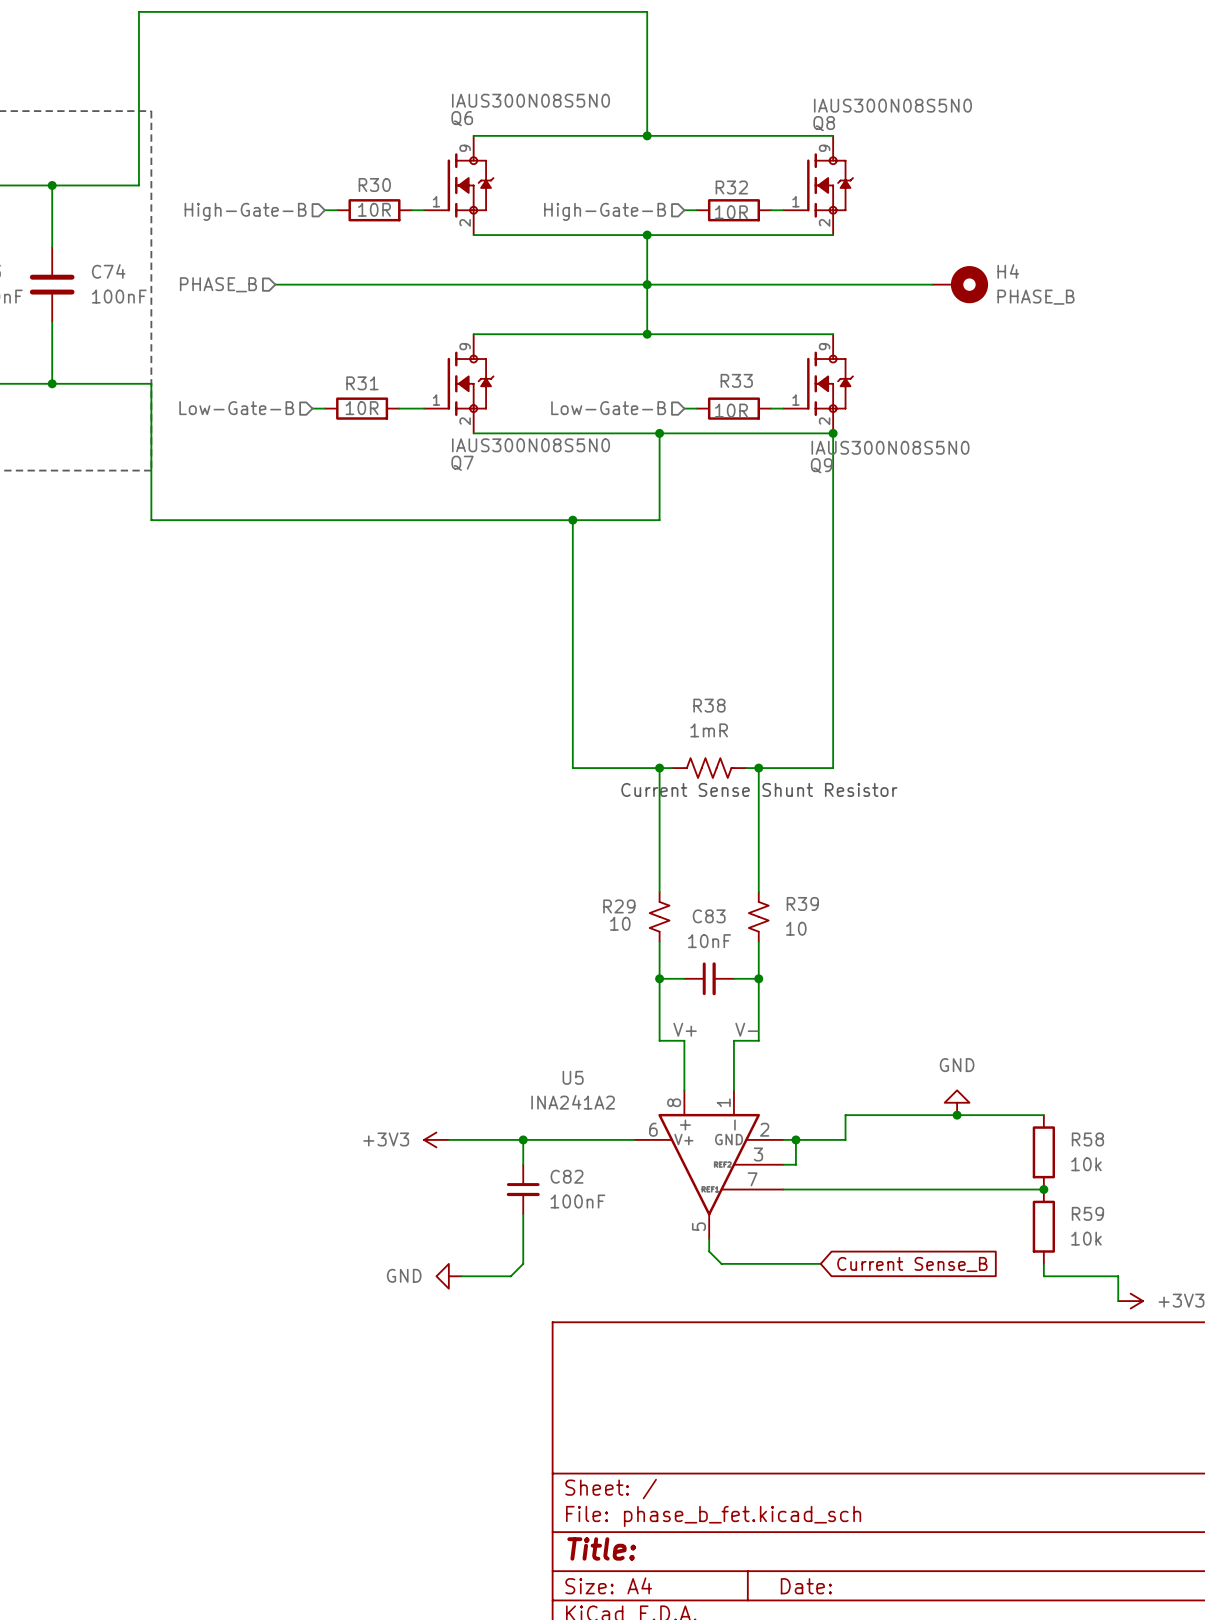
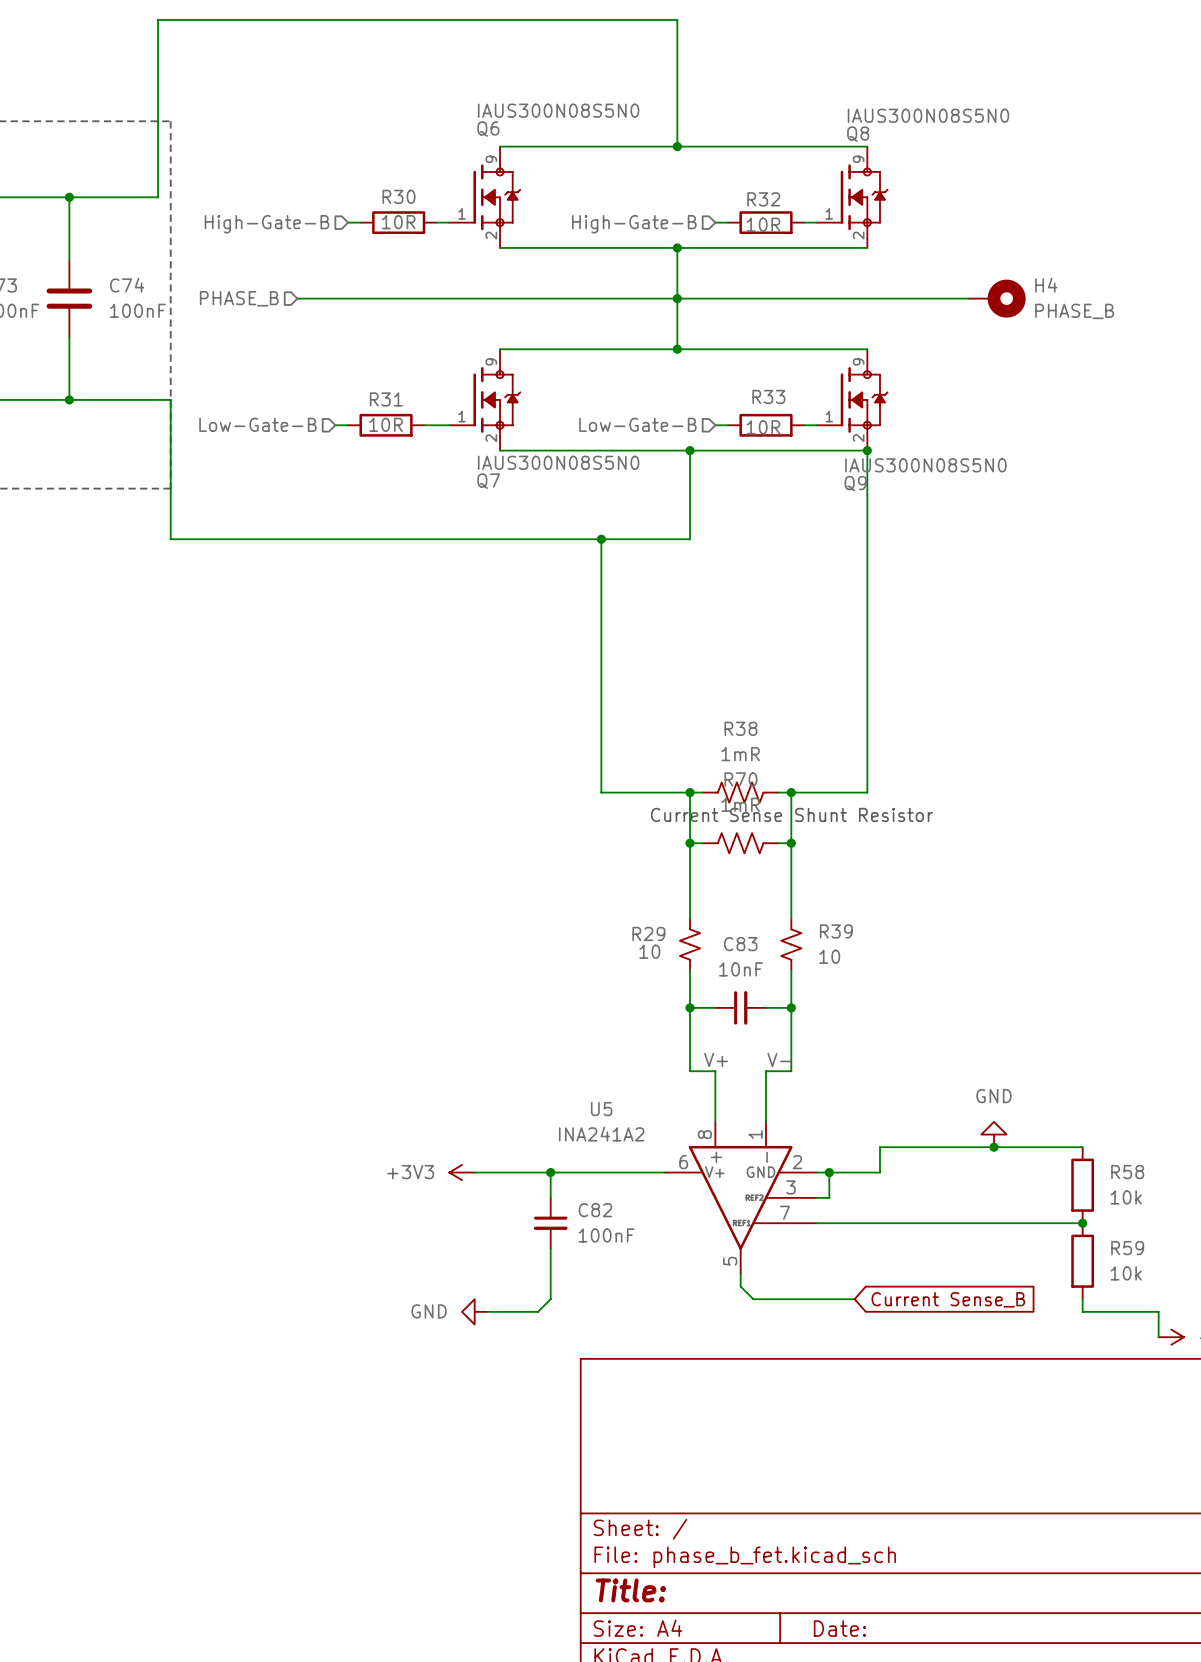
wire: none -> (690, 843) (702, 843)
junction: none -> (690, 843)
R70: none -> 1mR (740, 843)
wire: none -> (778, 843) (791, 843)
junction: none -> (791, 843)

